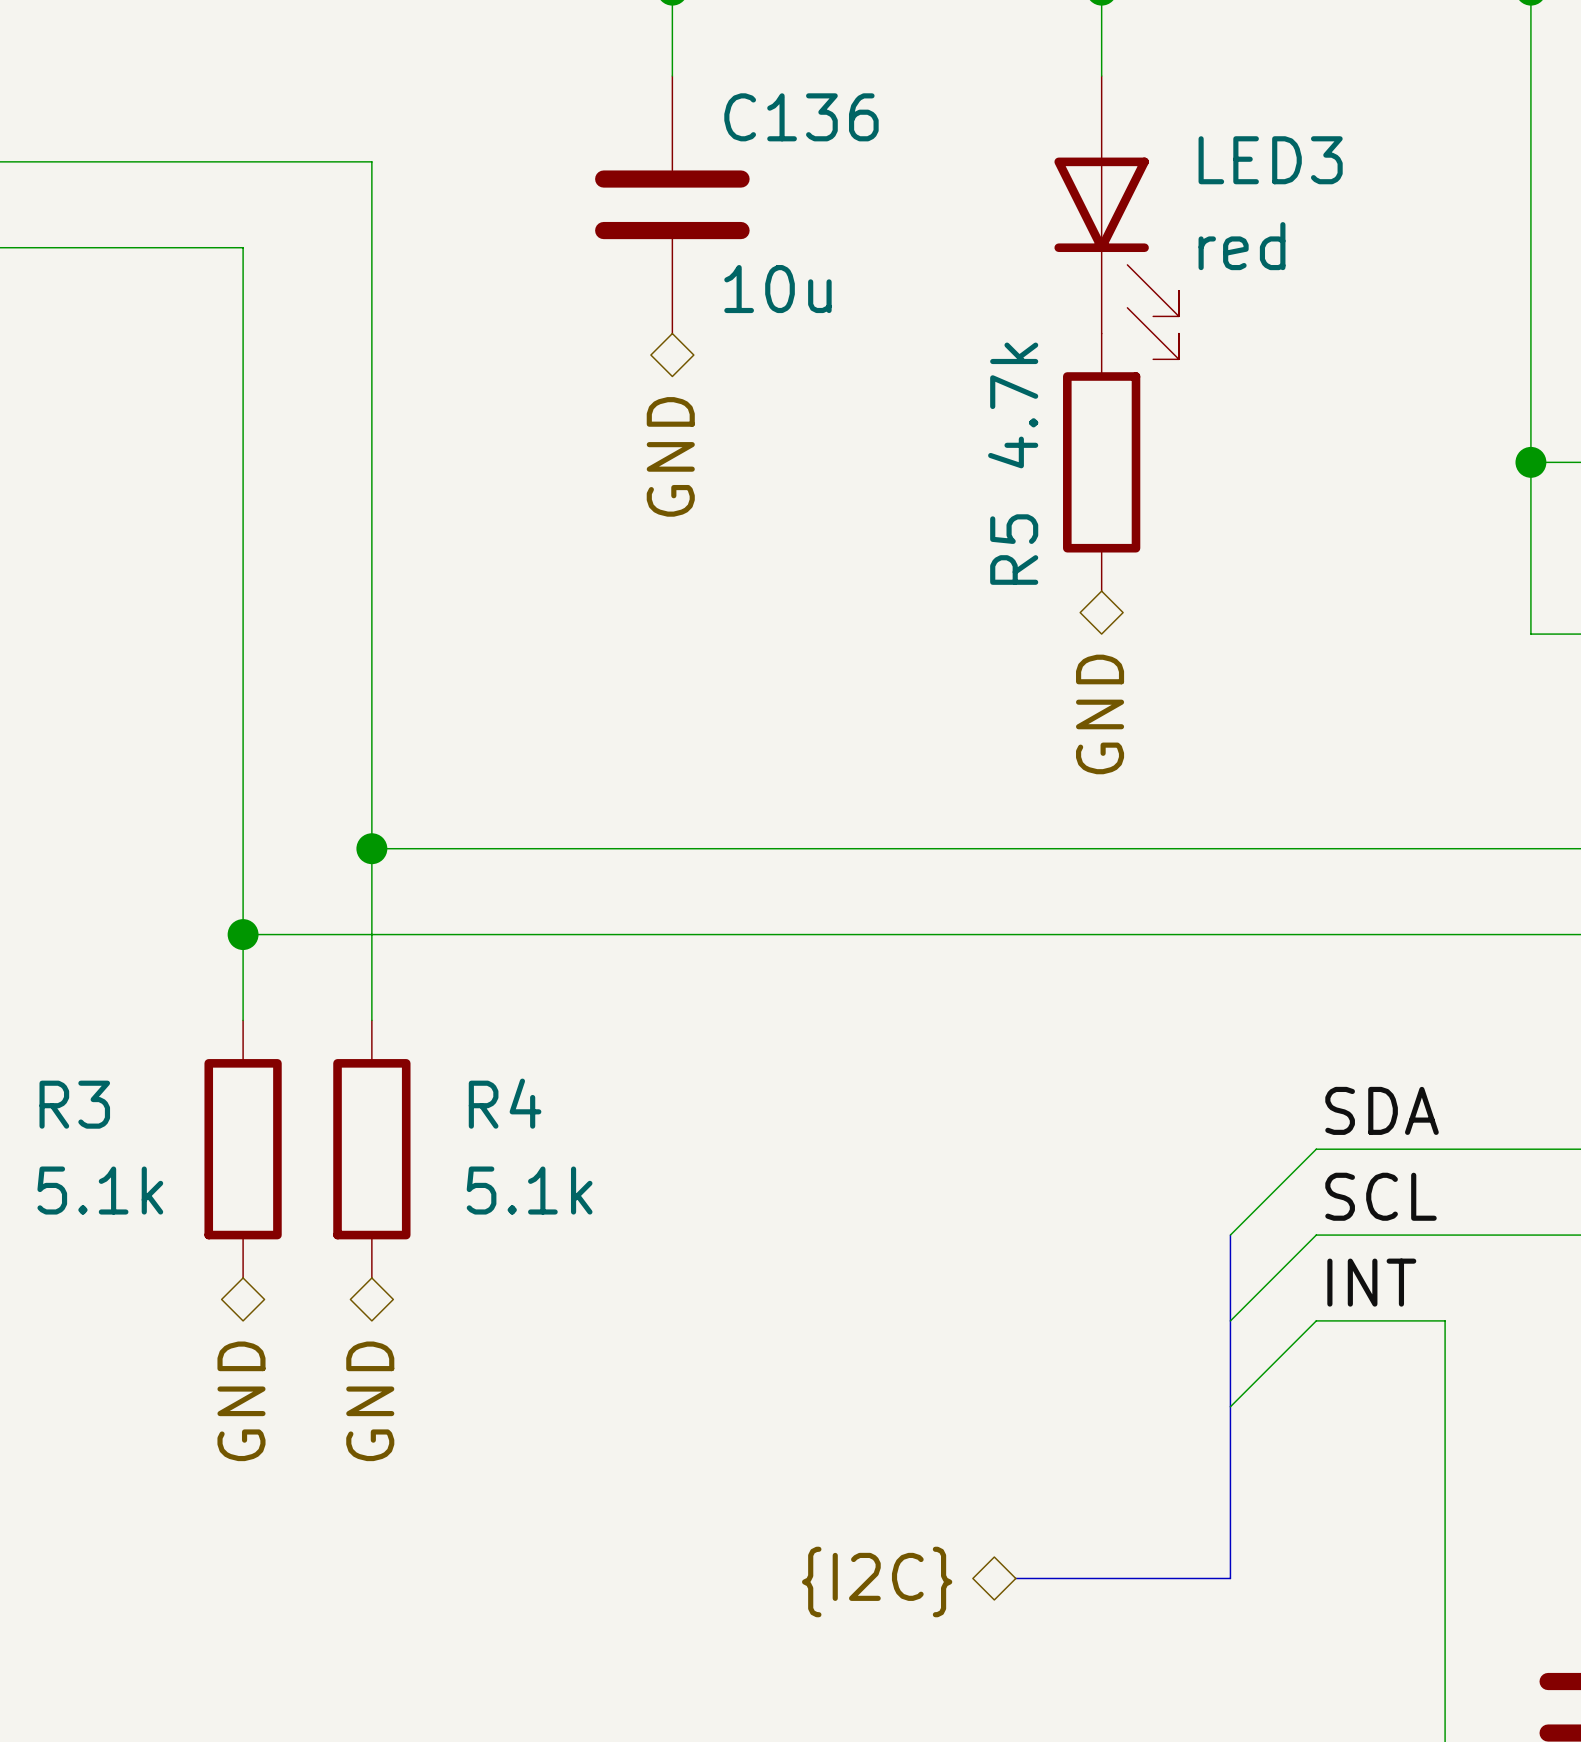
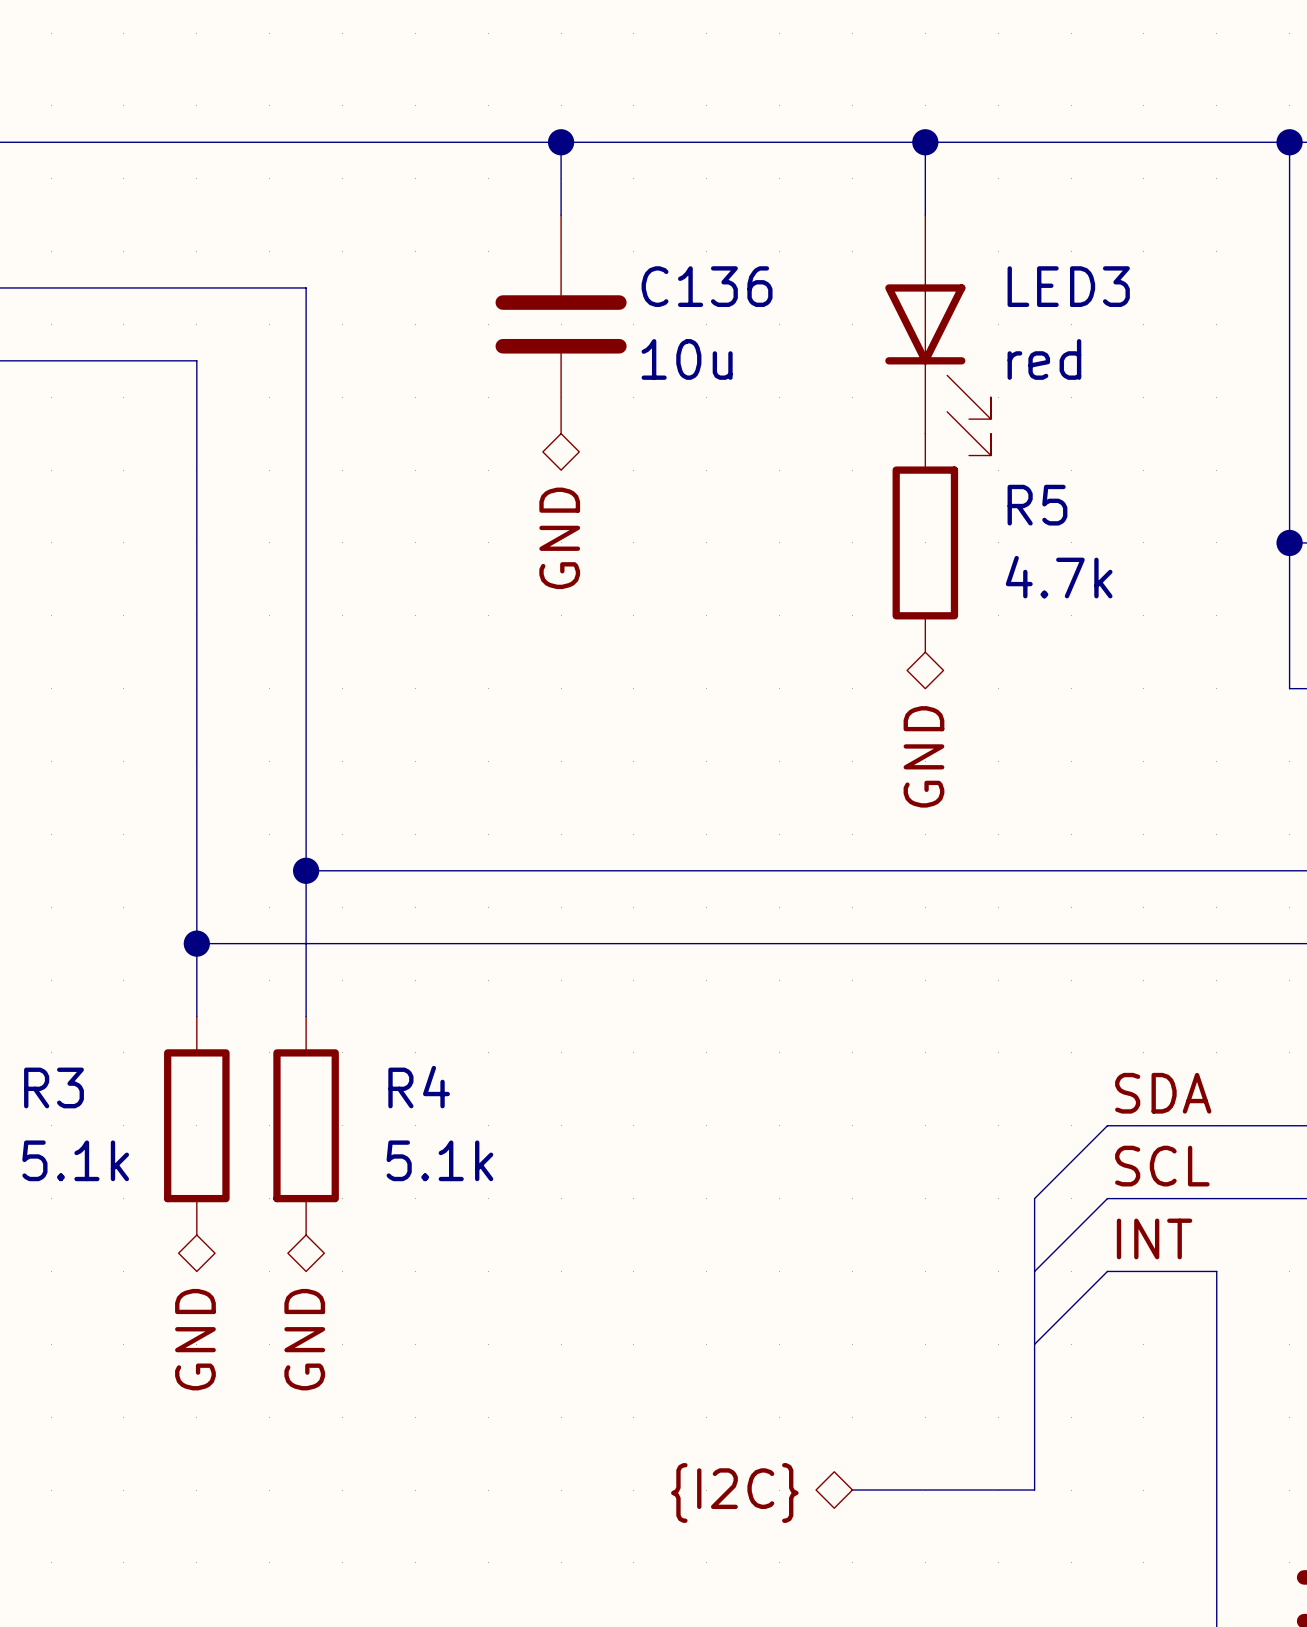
C136 name position: C136 (801, 117) -> C136 (707, 286)
C136 value position: 10u (777, 289) -> 10u (687, 359)
R5 value rotation: 0° (1013, 405) -> 90° clockwise (1059, 577)
R5 value position: 4.7k (1013, 405) -> 4.7k (1059, 577)
R5 name rotation: 0° (1014, 549) -> 90° clockwise (1037, 505)
R5 name position: R5 (1014, 549) -> R5 (1037, 505)

